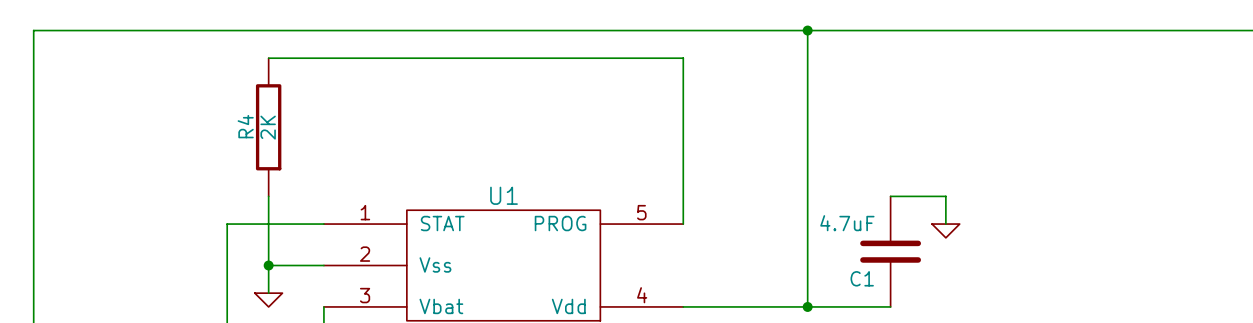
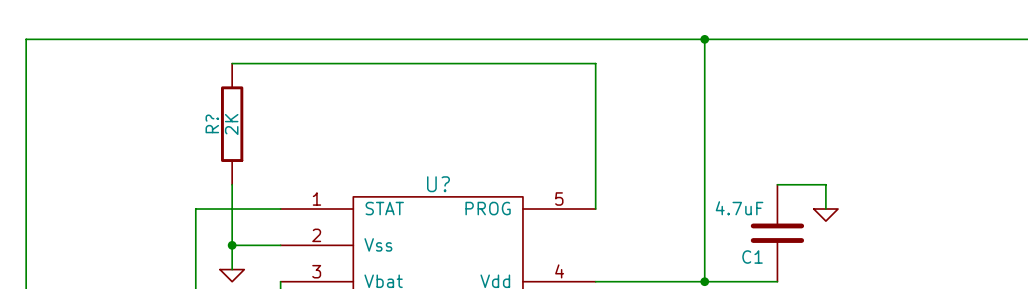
R4 name: R4 (245, 126) -> R? (212, 123)
U1 name: U1 (504, 195) -> U? (438, 184)

